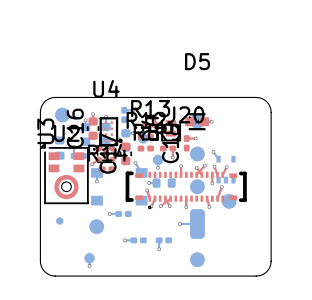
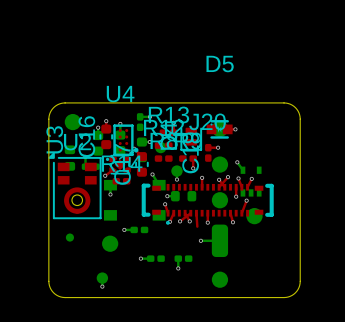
top track: none -> (196, 213) (197, 226)

